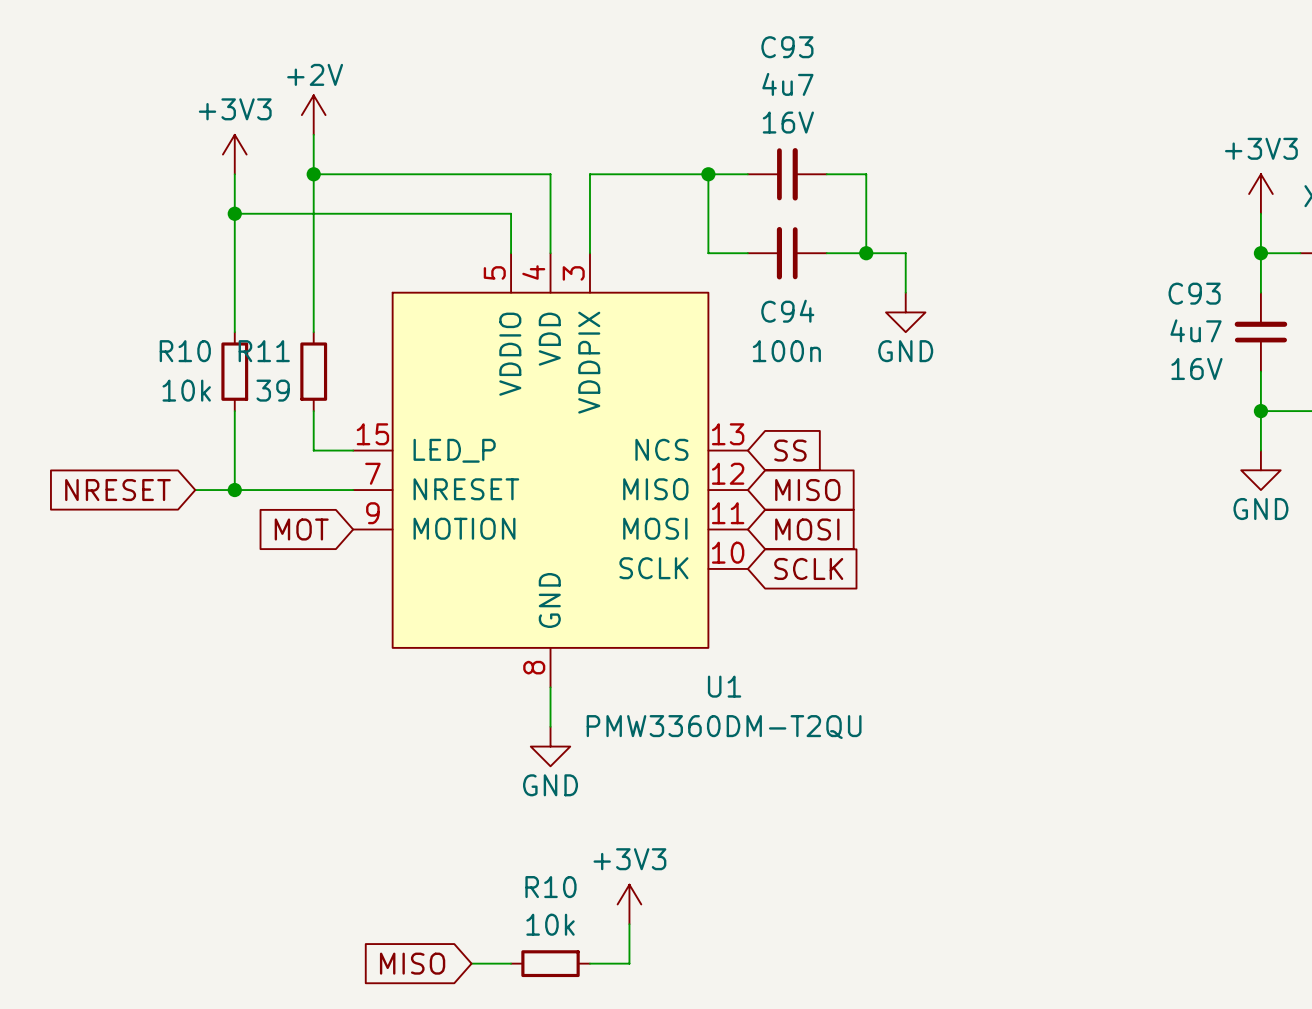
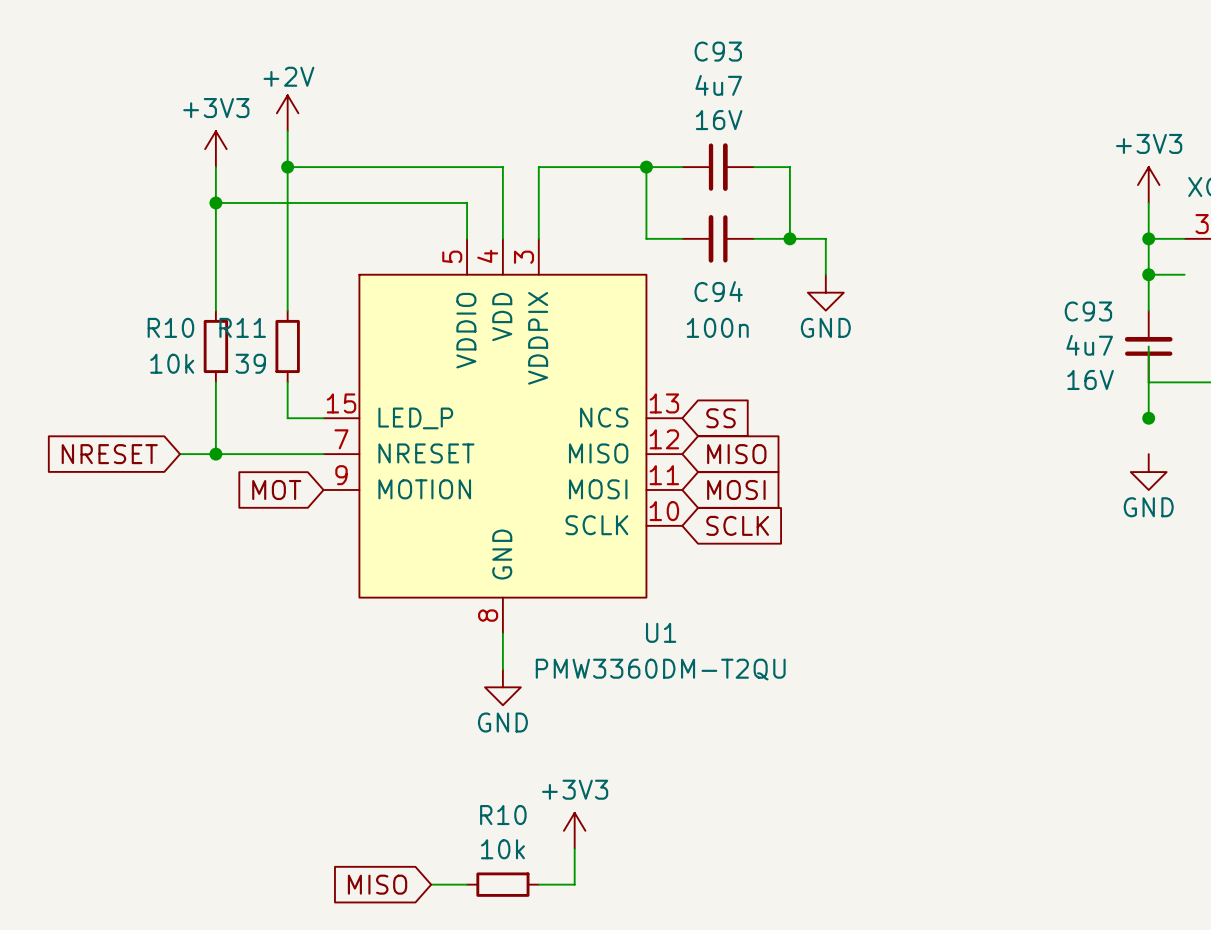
junction: none -> (1148, 274)
wire: none -> (1184, 274) (1148, 274) (1148, 310)
C93 position: (1260, 332) -> (1148, 346)
junction position: (1260, 411) -> (1148, 418)
power symbol position: GND (1260, 470) -> GND (1148, 472)

